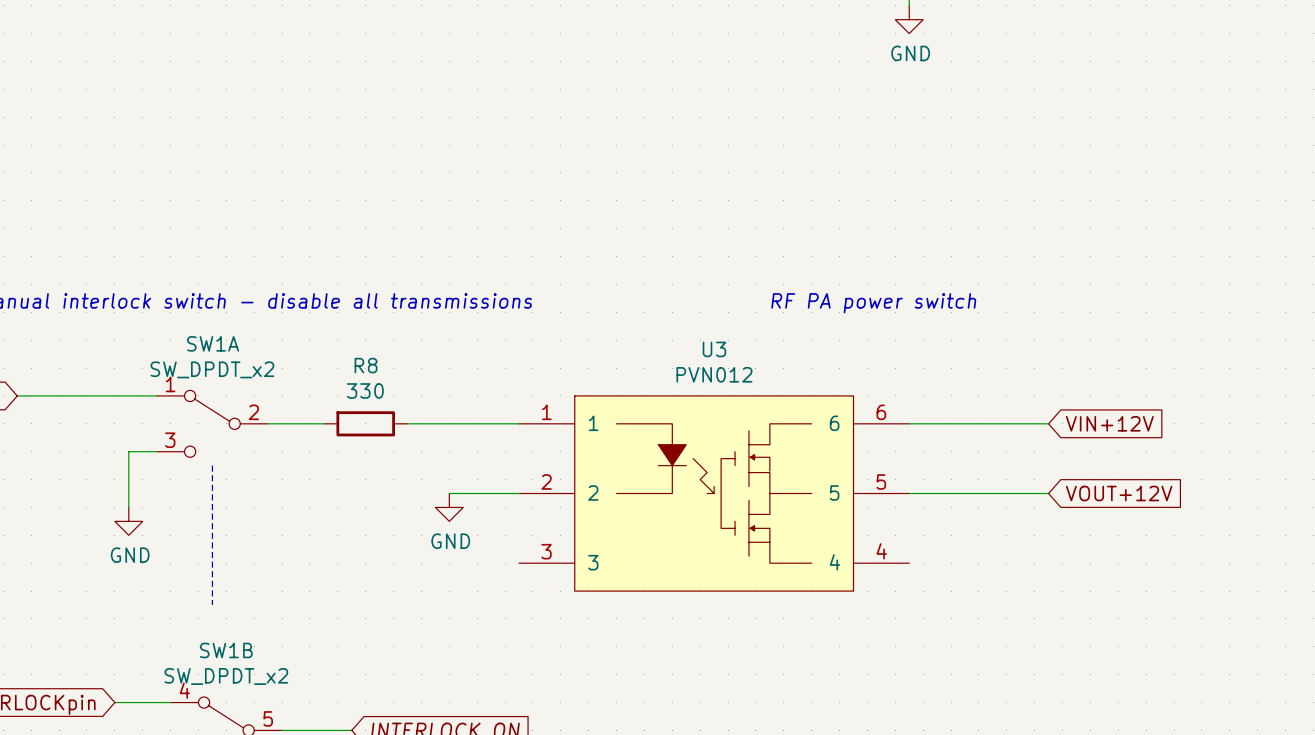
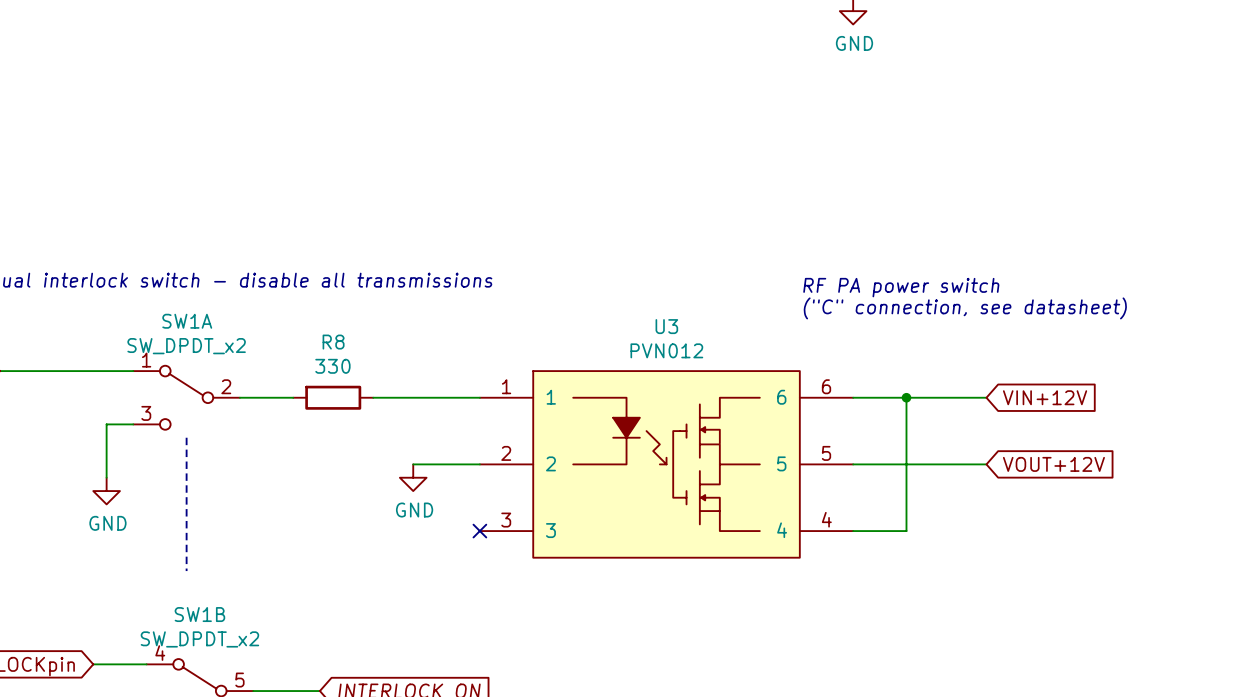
text position: RF PA power switch (873, 303) -> RF PA power switch (901, 287)
text: none -> ("C" connection, see datasheet) (965, 308)
wire: none -> (906, 397) (906, 531) (853, 531)
junction: none -> (906, 397)
no-connect mark: none -> (479, 531)

